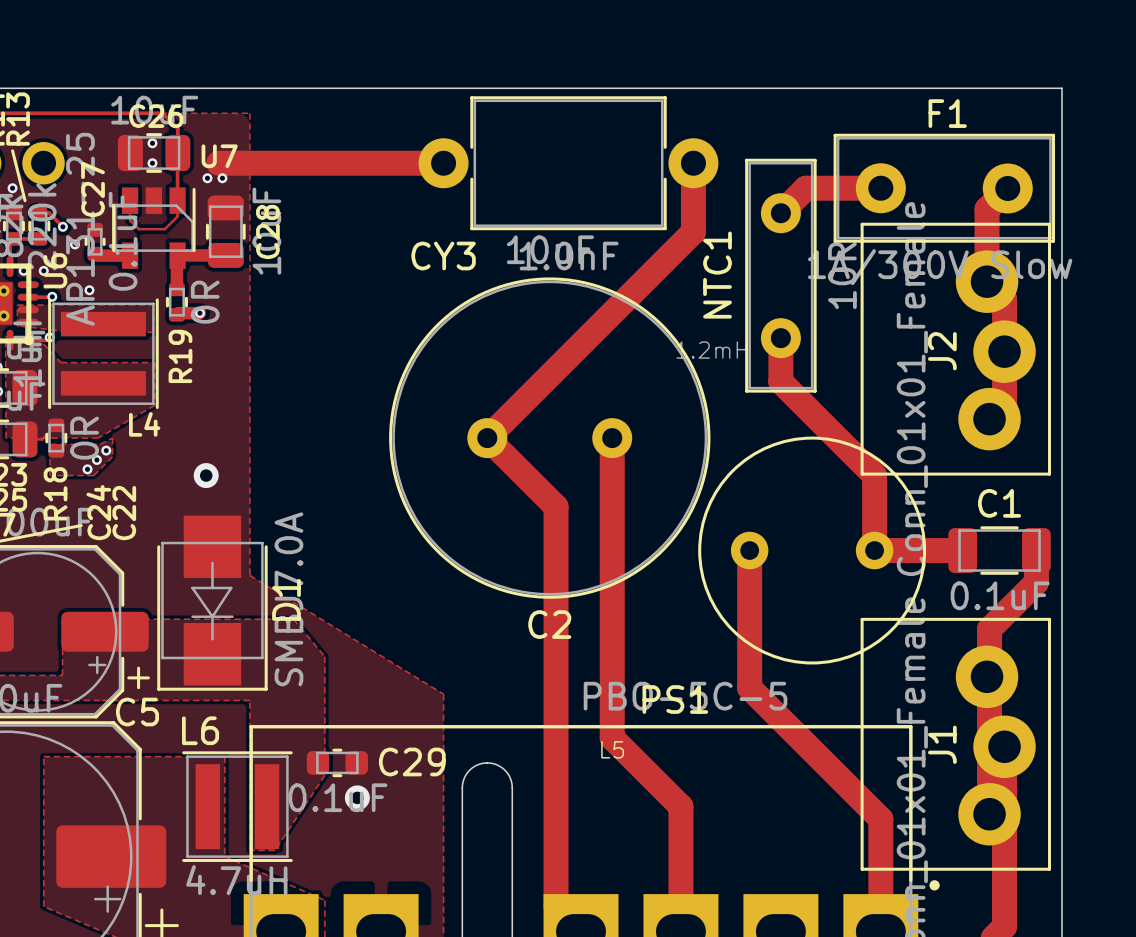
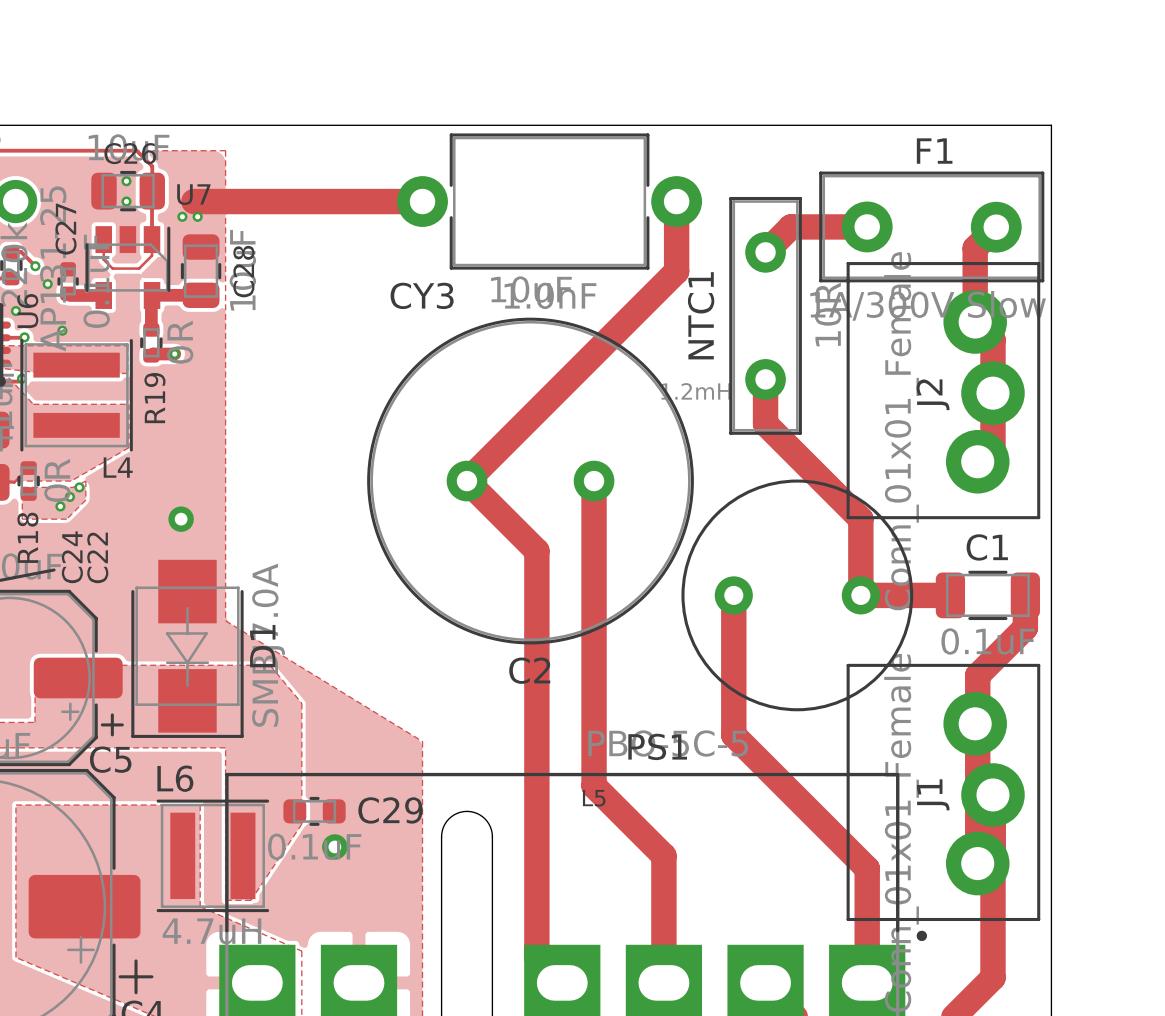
via: none -> (79, 487)
via: (106, 450) -> none
via: none -> (69, 496)
via: (96, 459) -> none
via: none -> (60, 506)
via: (87, 469) -> none

